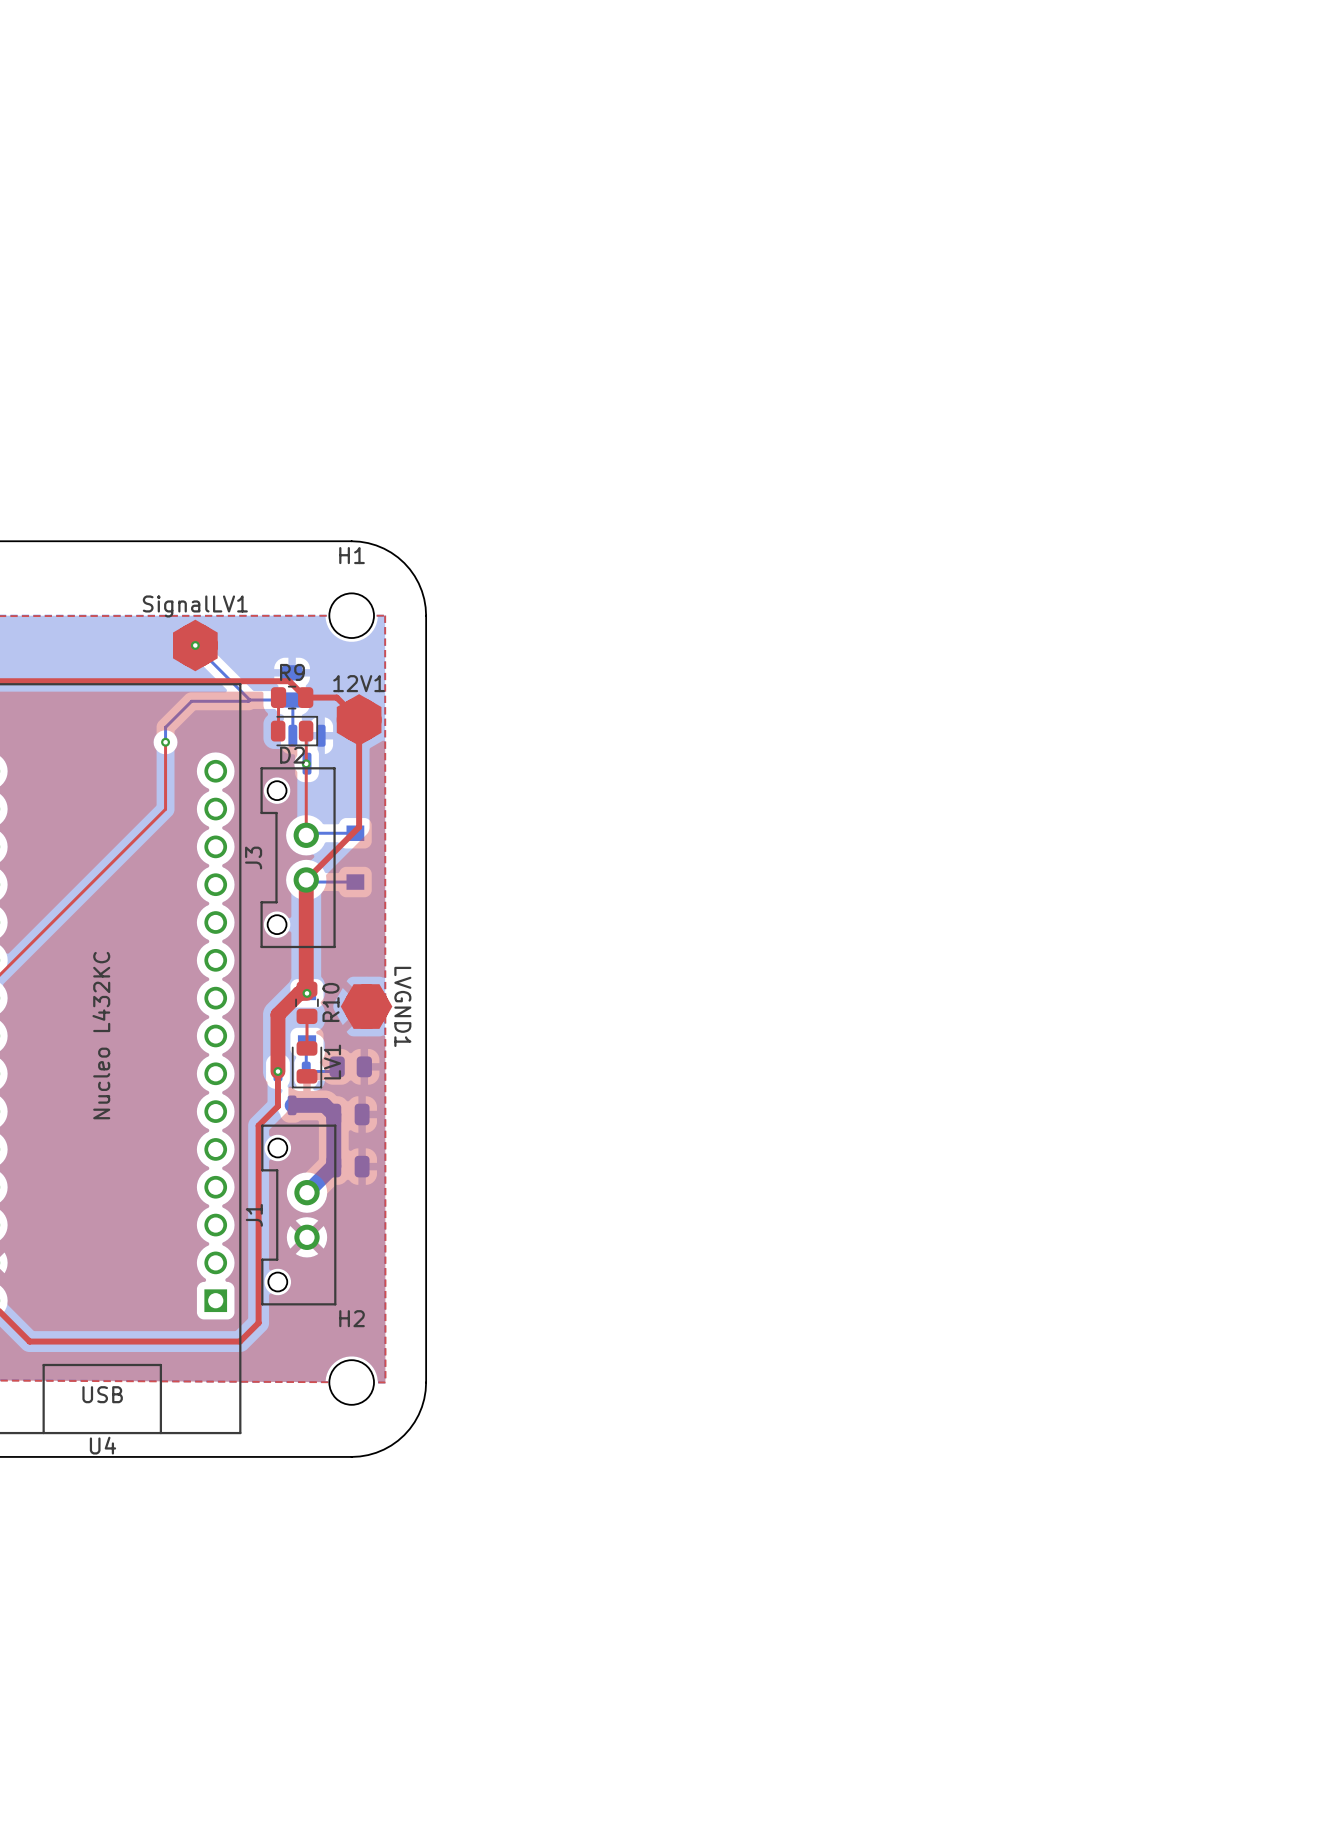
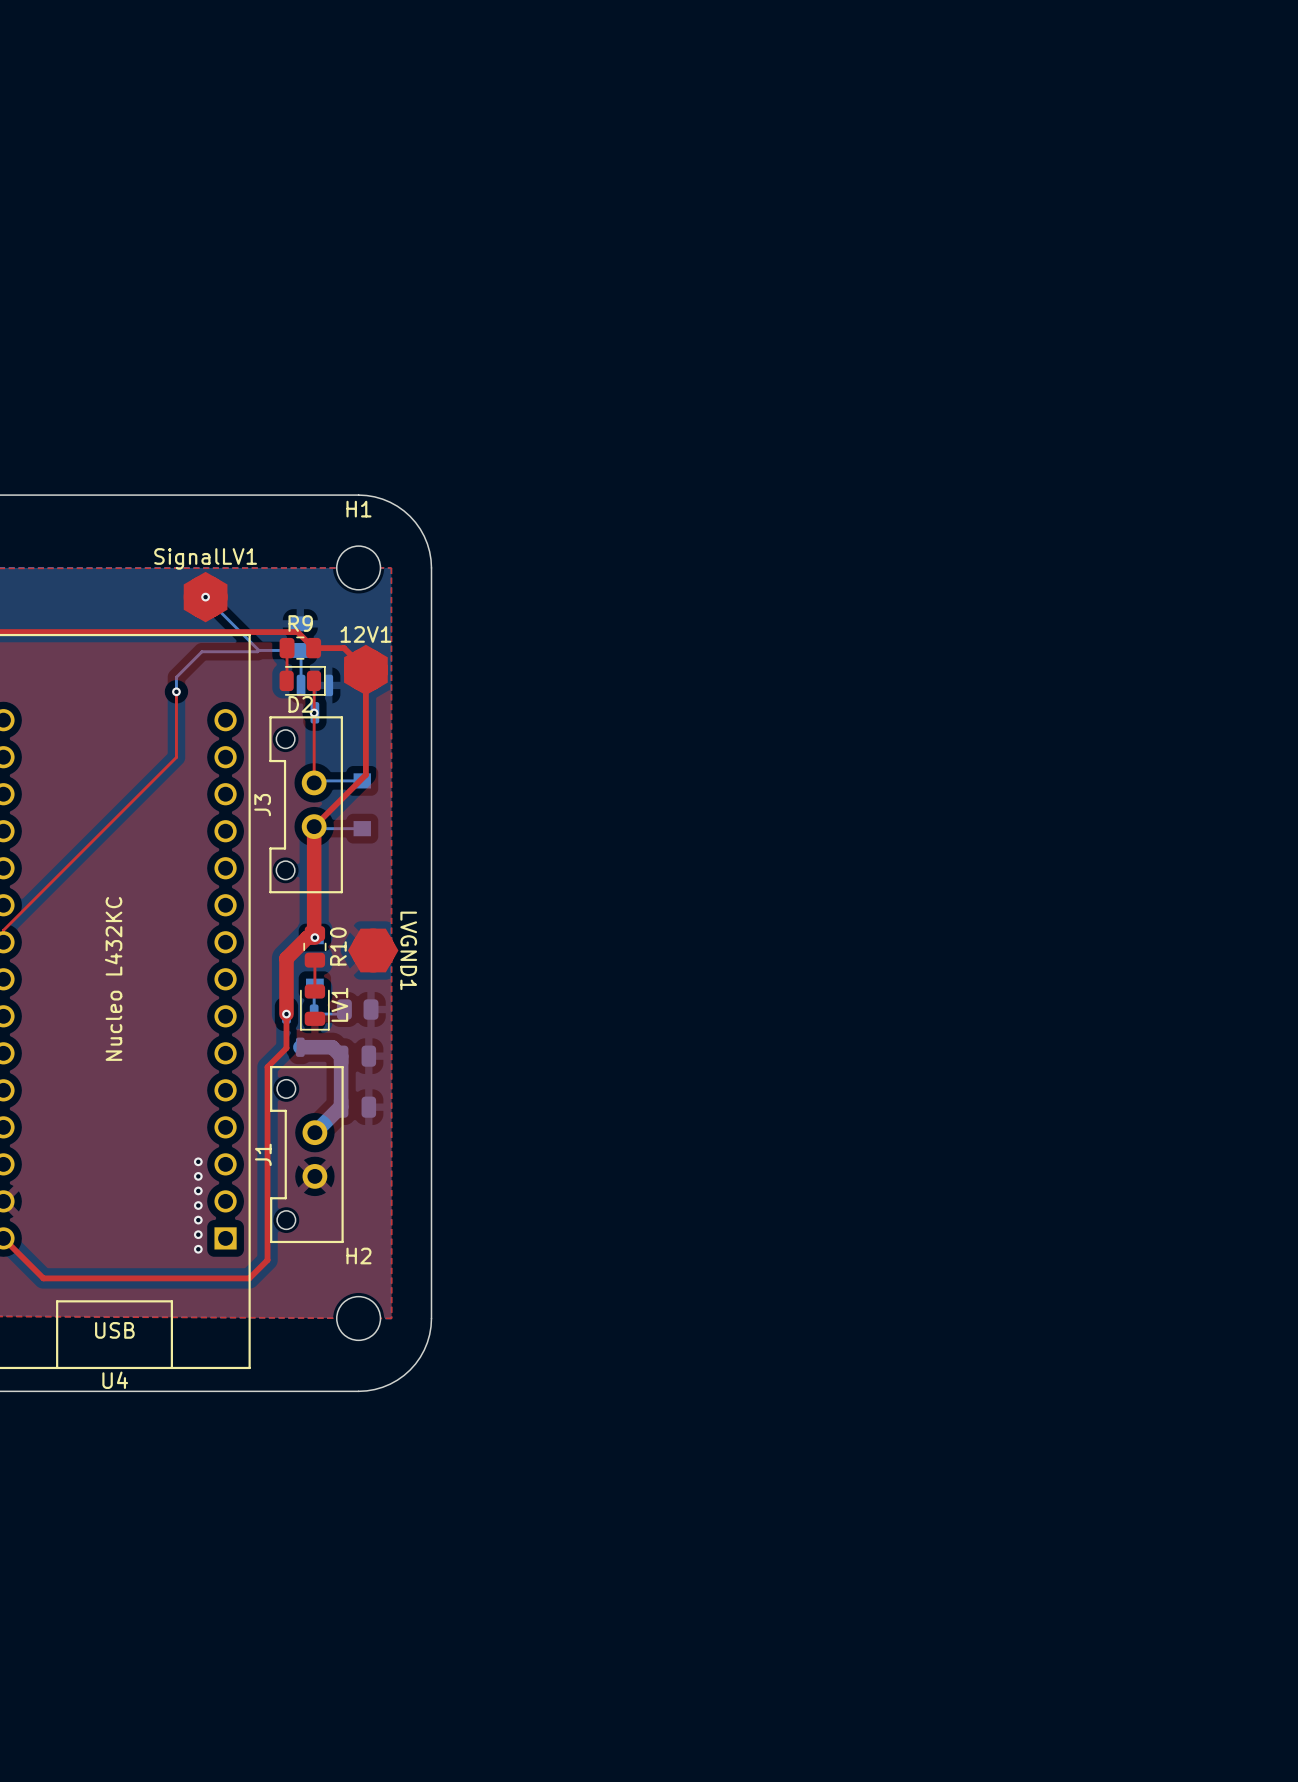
via: none -> (198, 1161)
via: none -> (198, 1176)
via: none -> (198, 1190)
via: none -> (198, 1205)
via: none -> (198, 1220)
via: none -> (198, 1234)
via: none -> (198, 1249)

